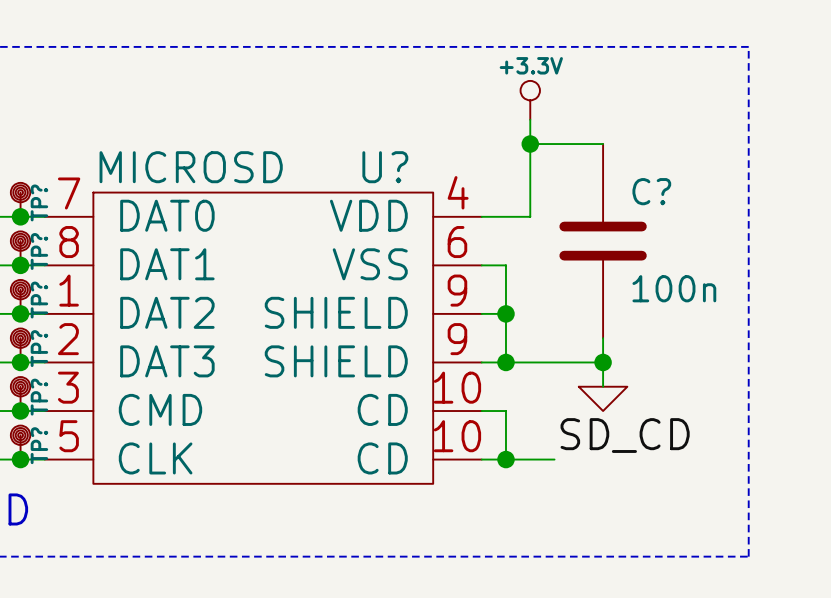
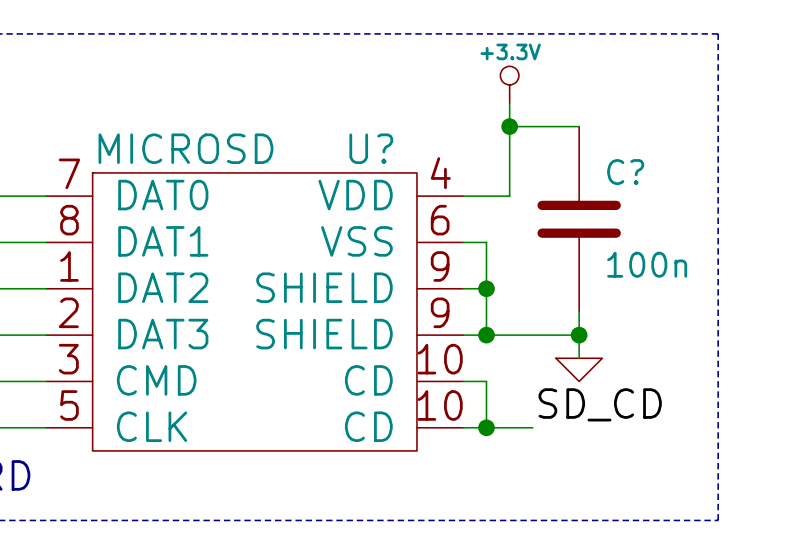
TP?: (20, 199) -> none
junction: (20, 216) -> none
TP?: (20, 248) -> none
junction: (20, 265) -> none
TP?: (20, 296) -> none
junction: (20, 313) -> none
TP?: (20, 345) -> none
junction: (20, 362) -> none
TP?: (20, 394) -> none
junction: (20, 411) -> none
TP?: (20, 442) -> none
junction: (20, 459) -> none

